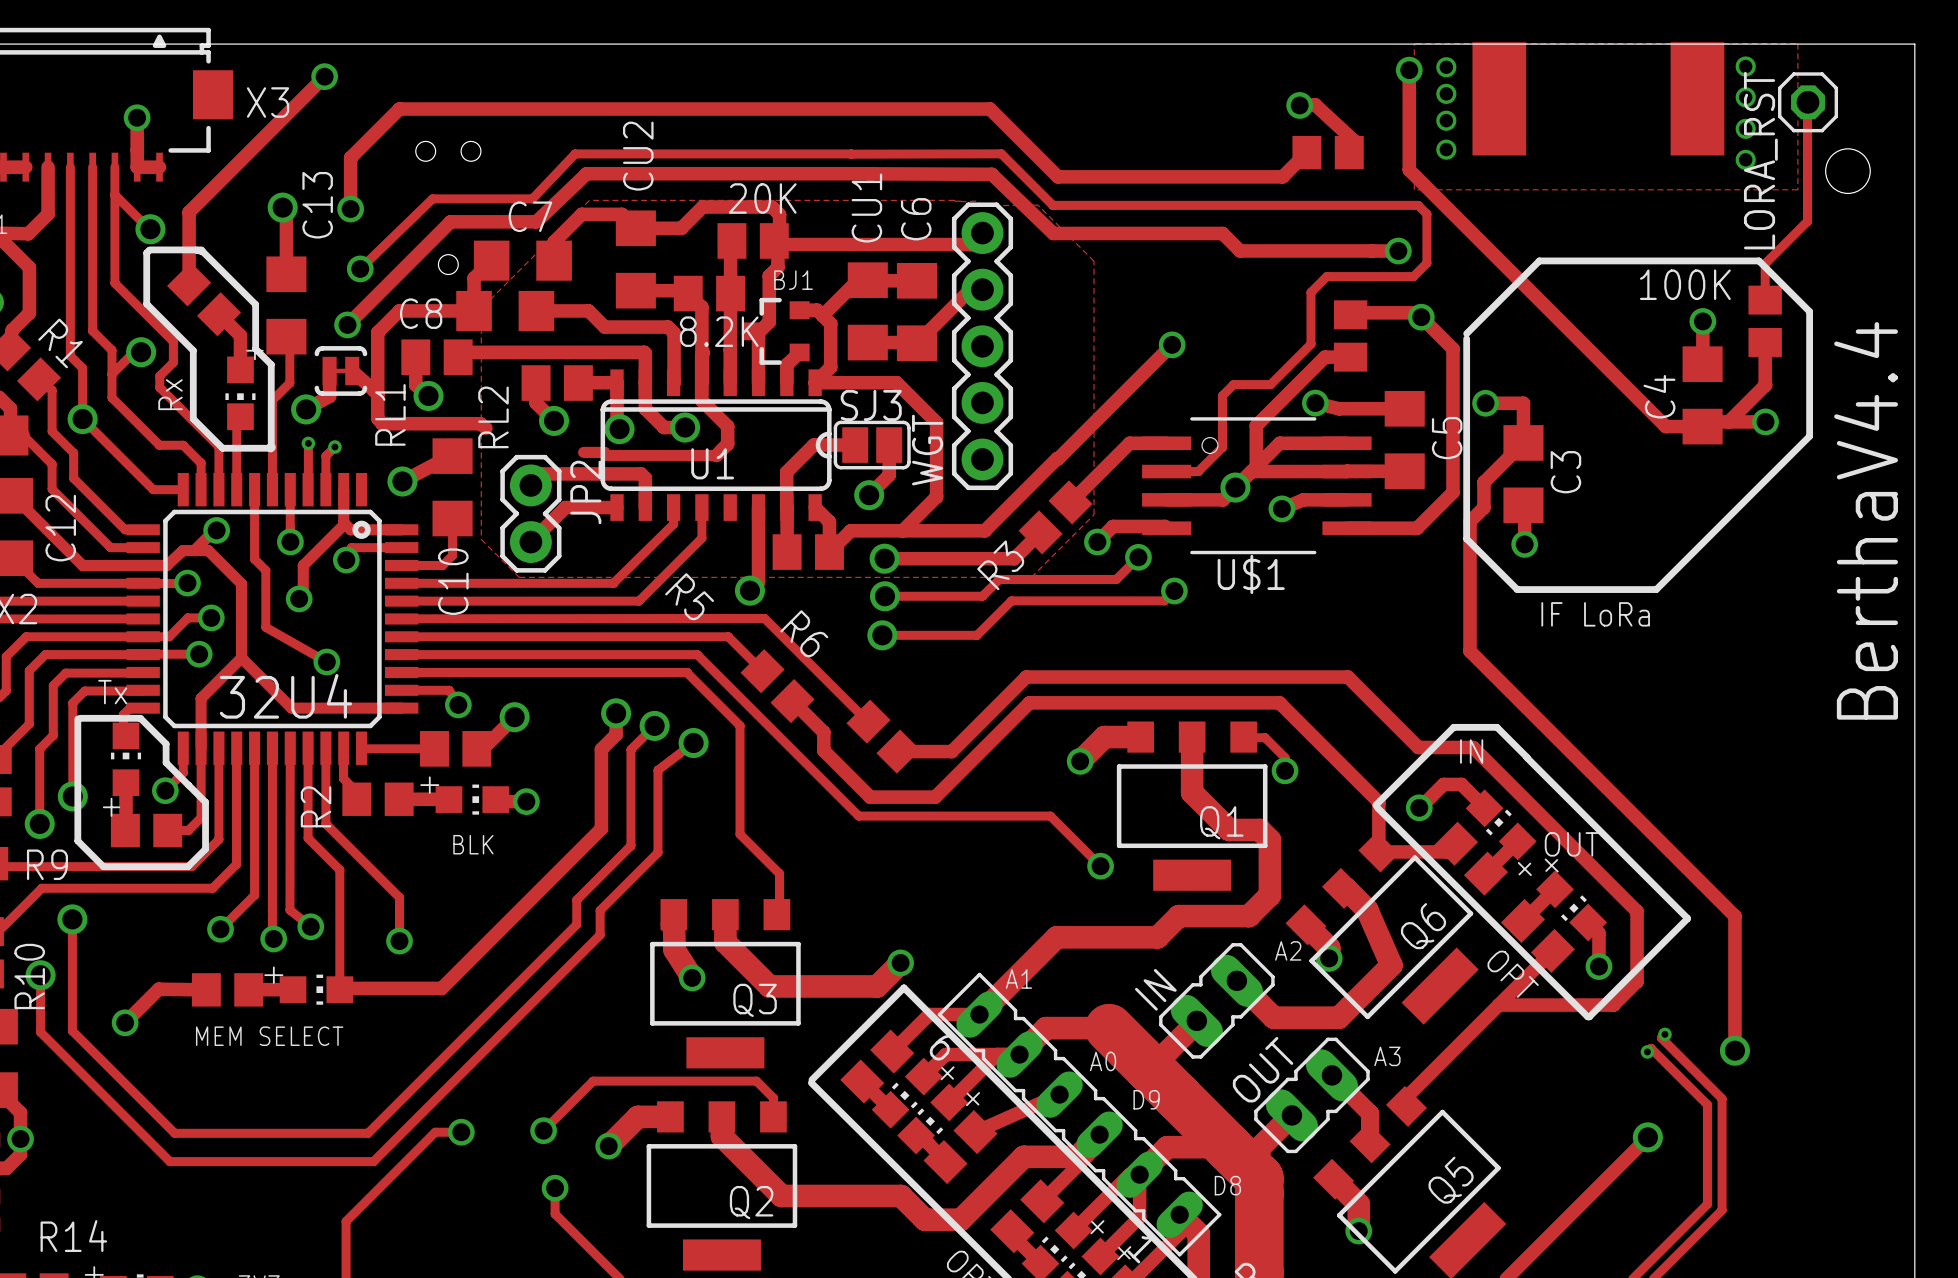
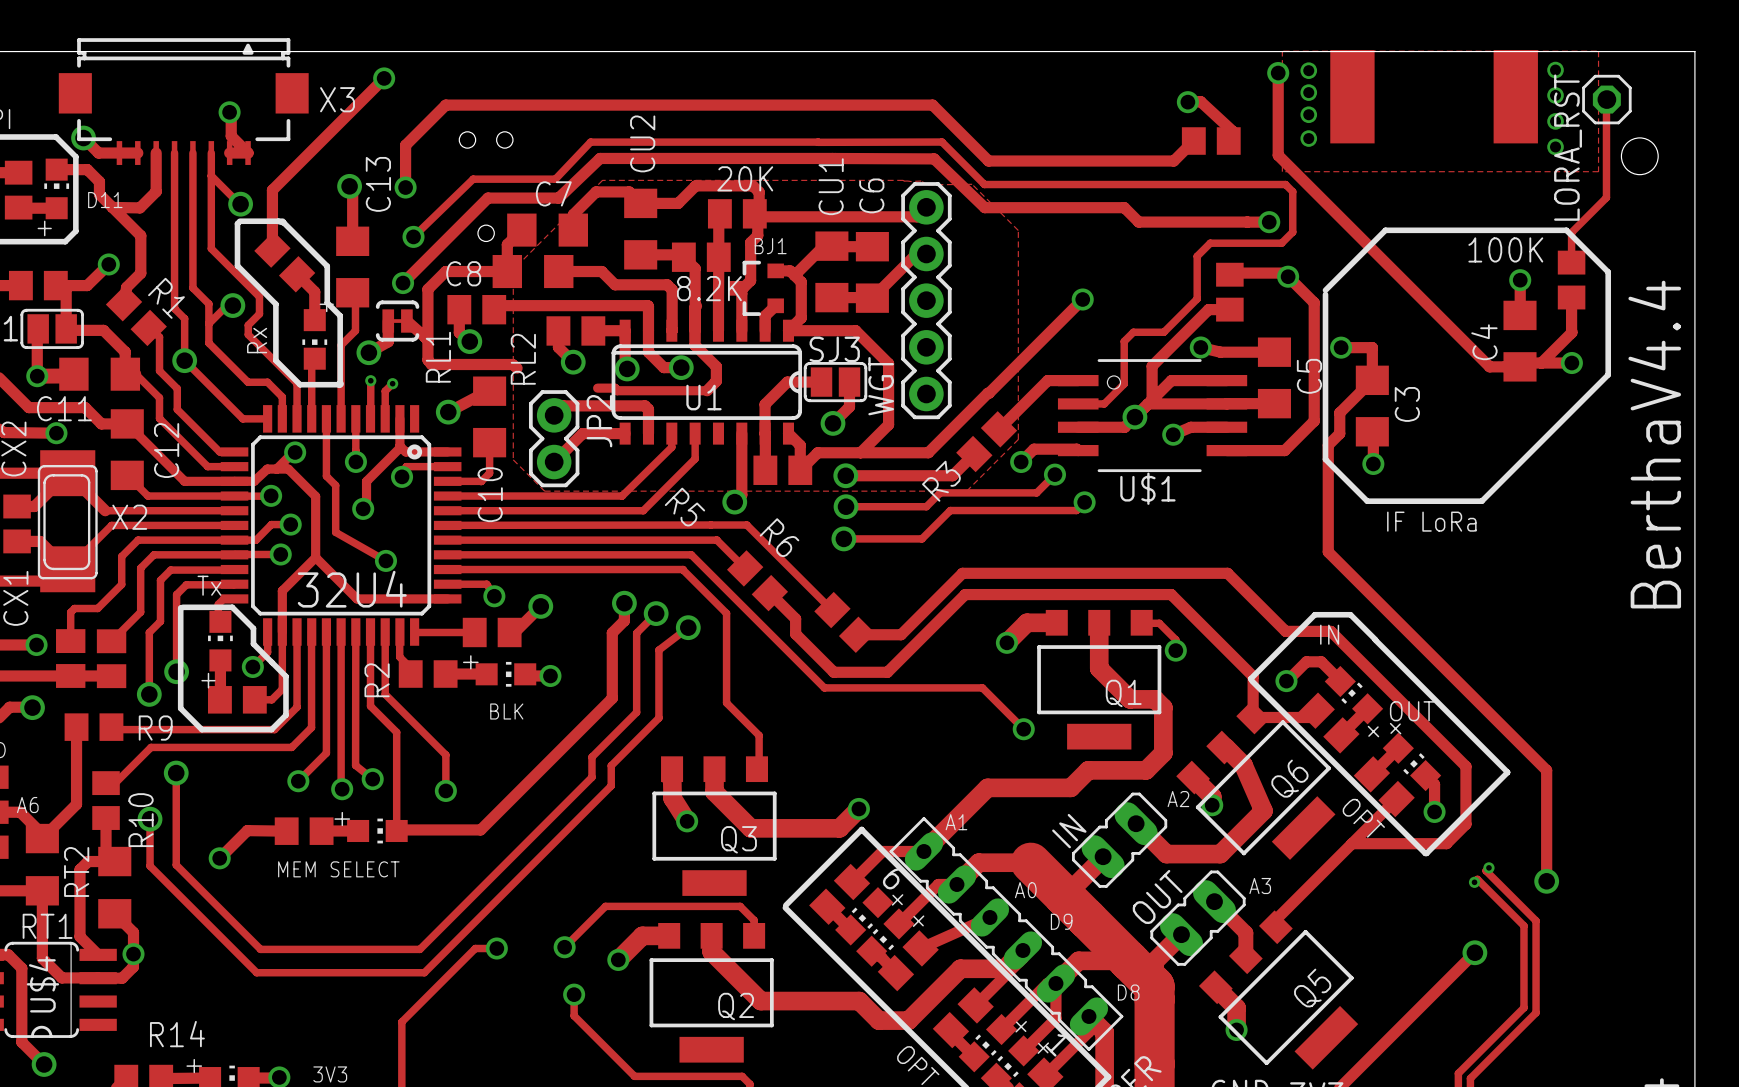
track: (137, 117) (137, 167) -> none
track: none -> (231, 116) (231, 136) (248, 153)
track: (997, 1054) (945, 1054) (923, 1076) -> none

